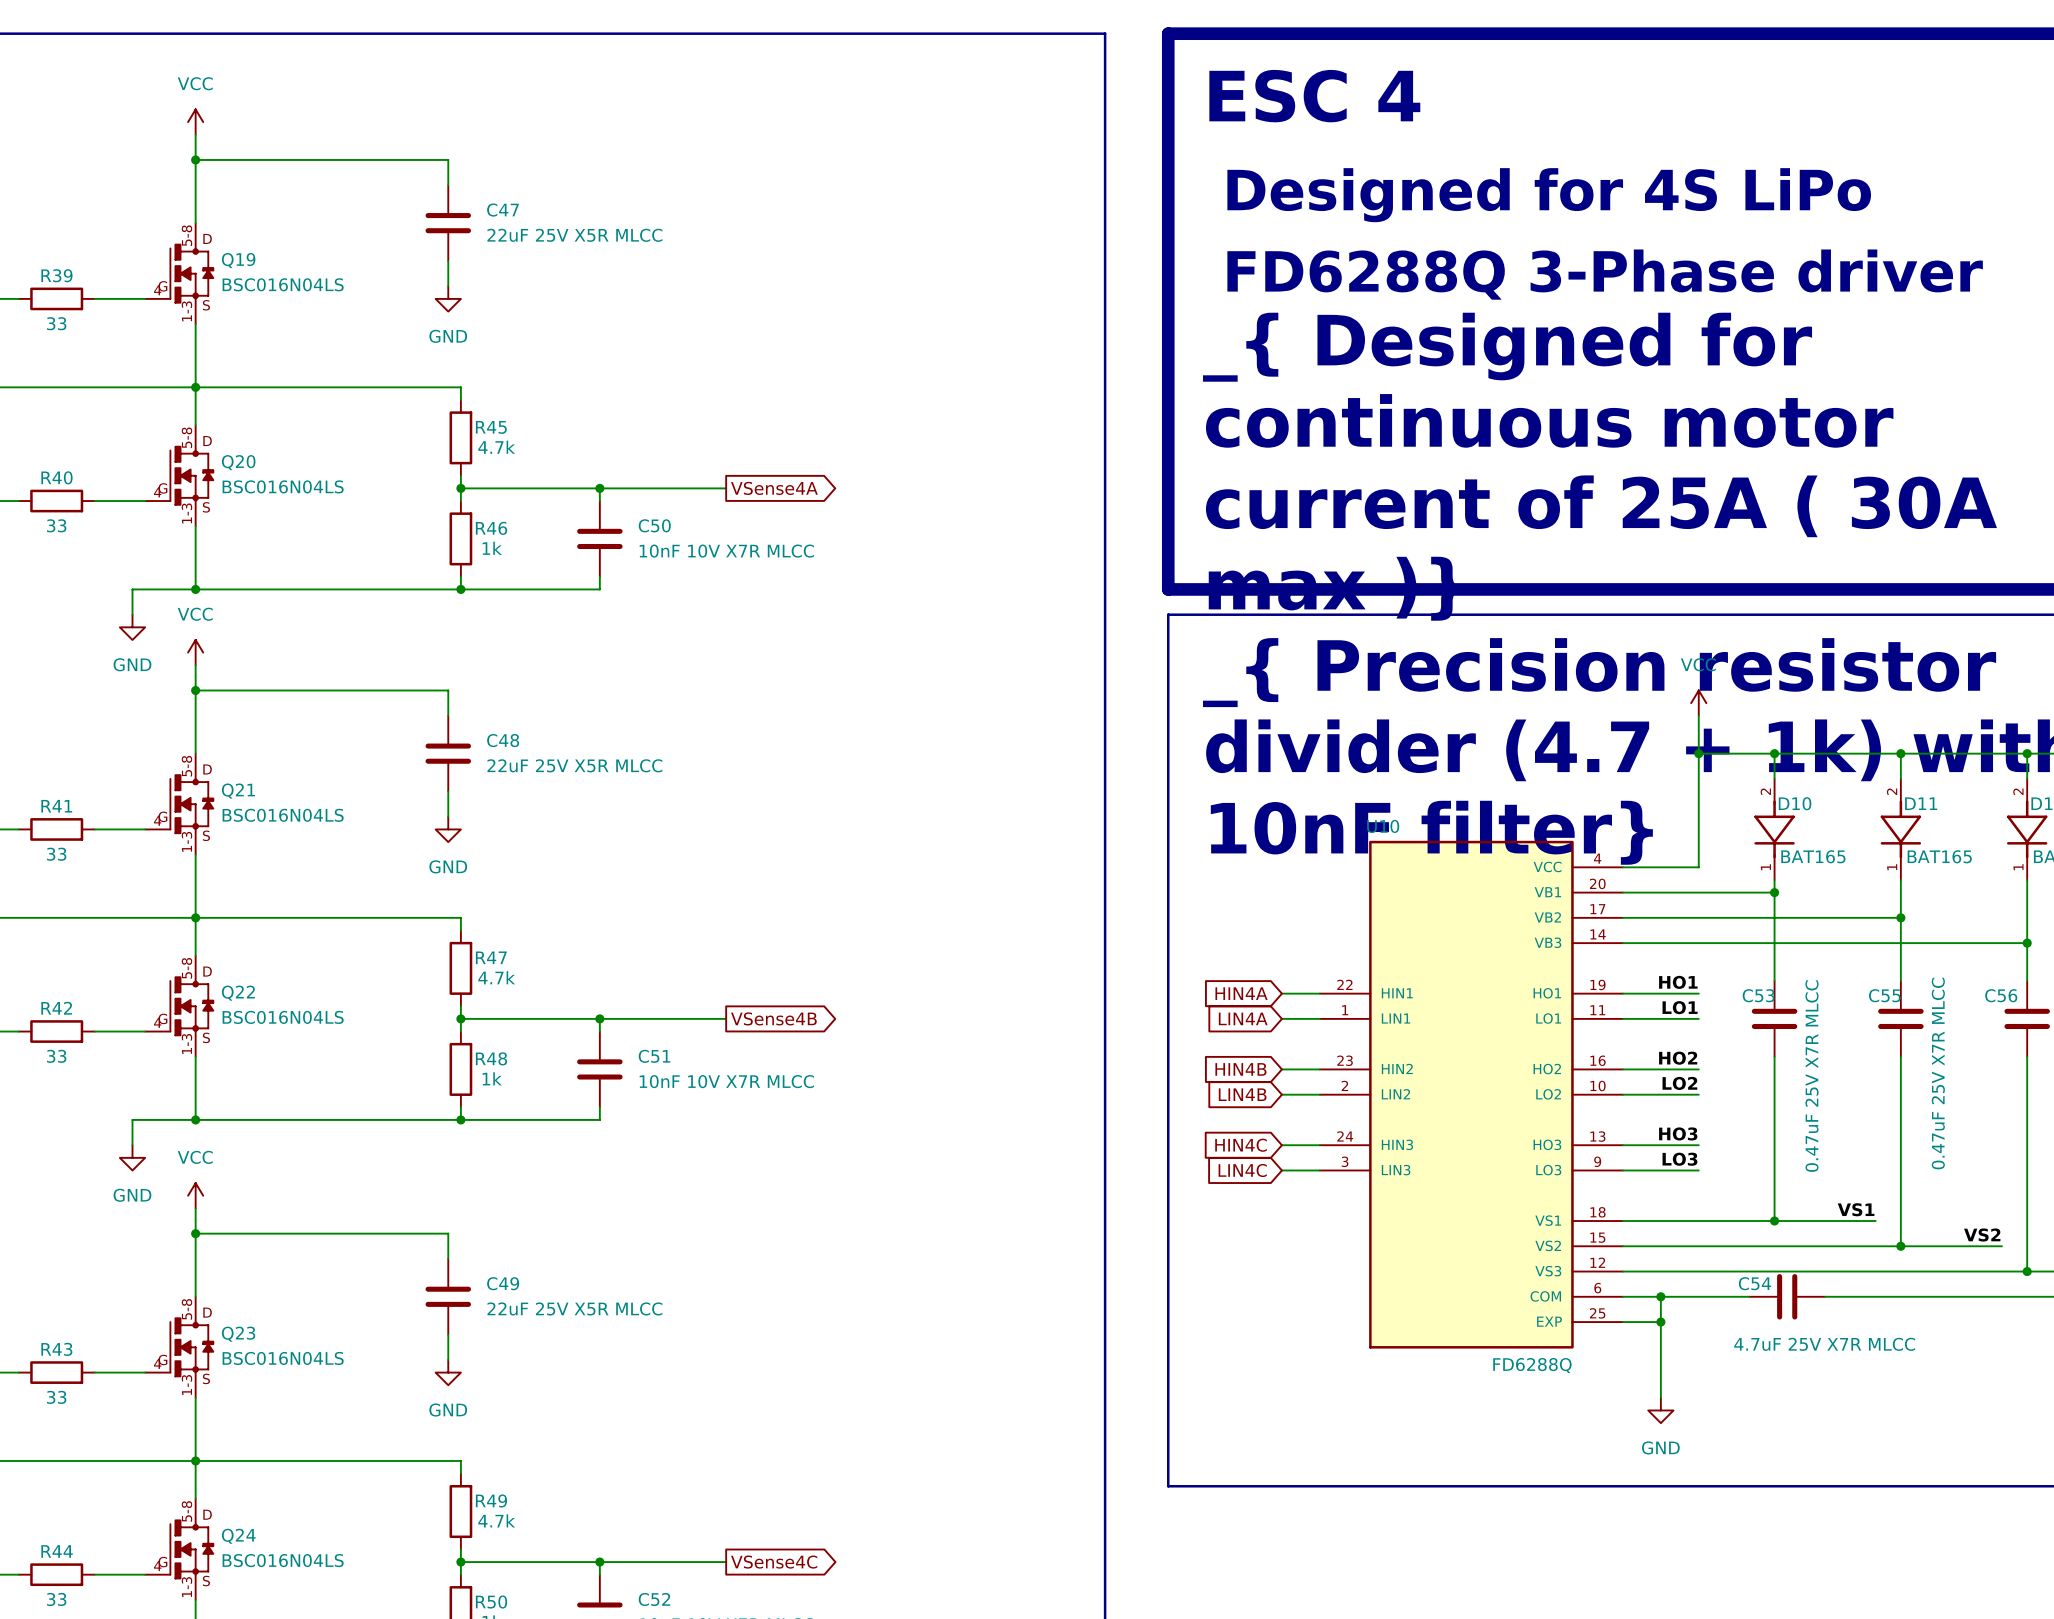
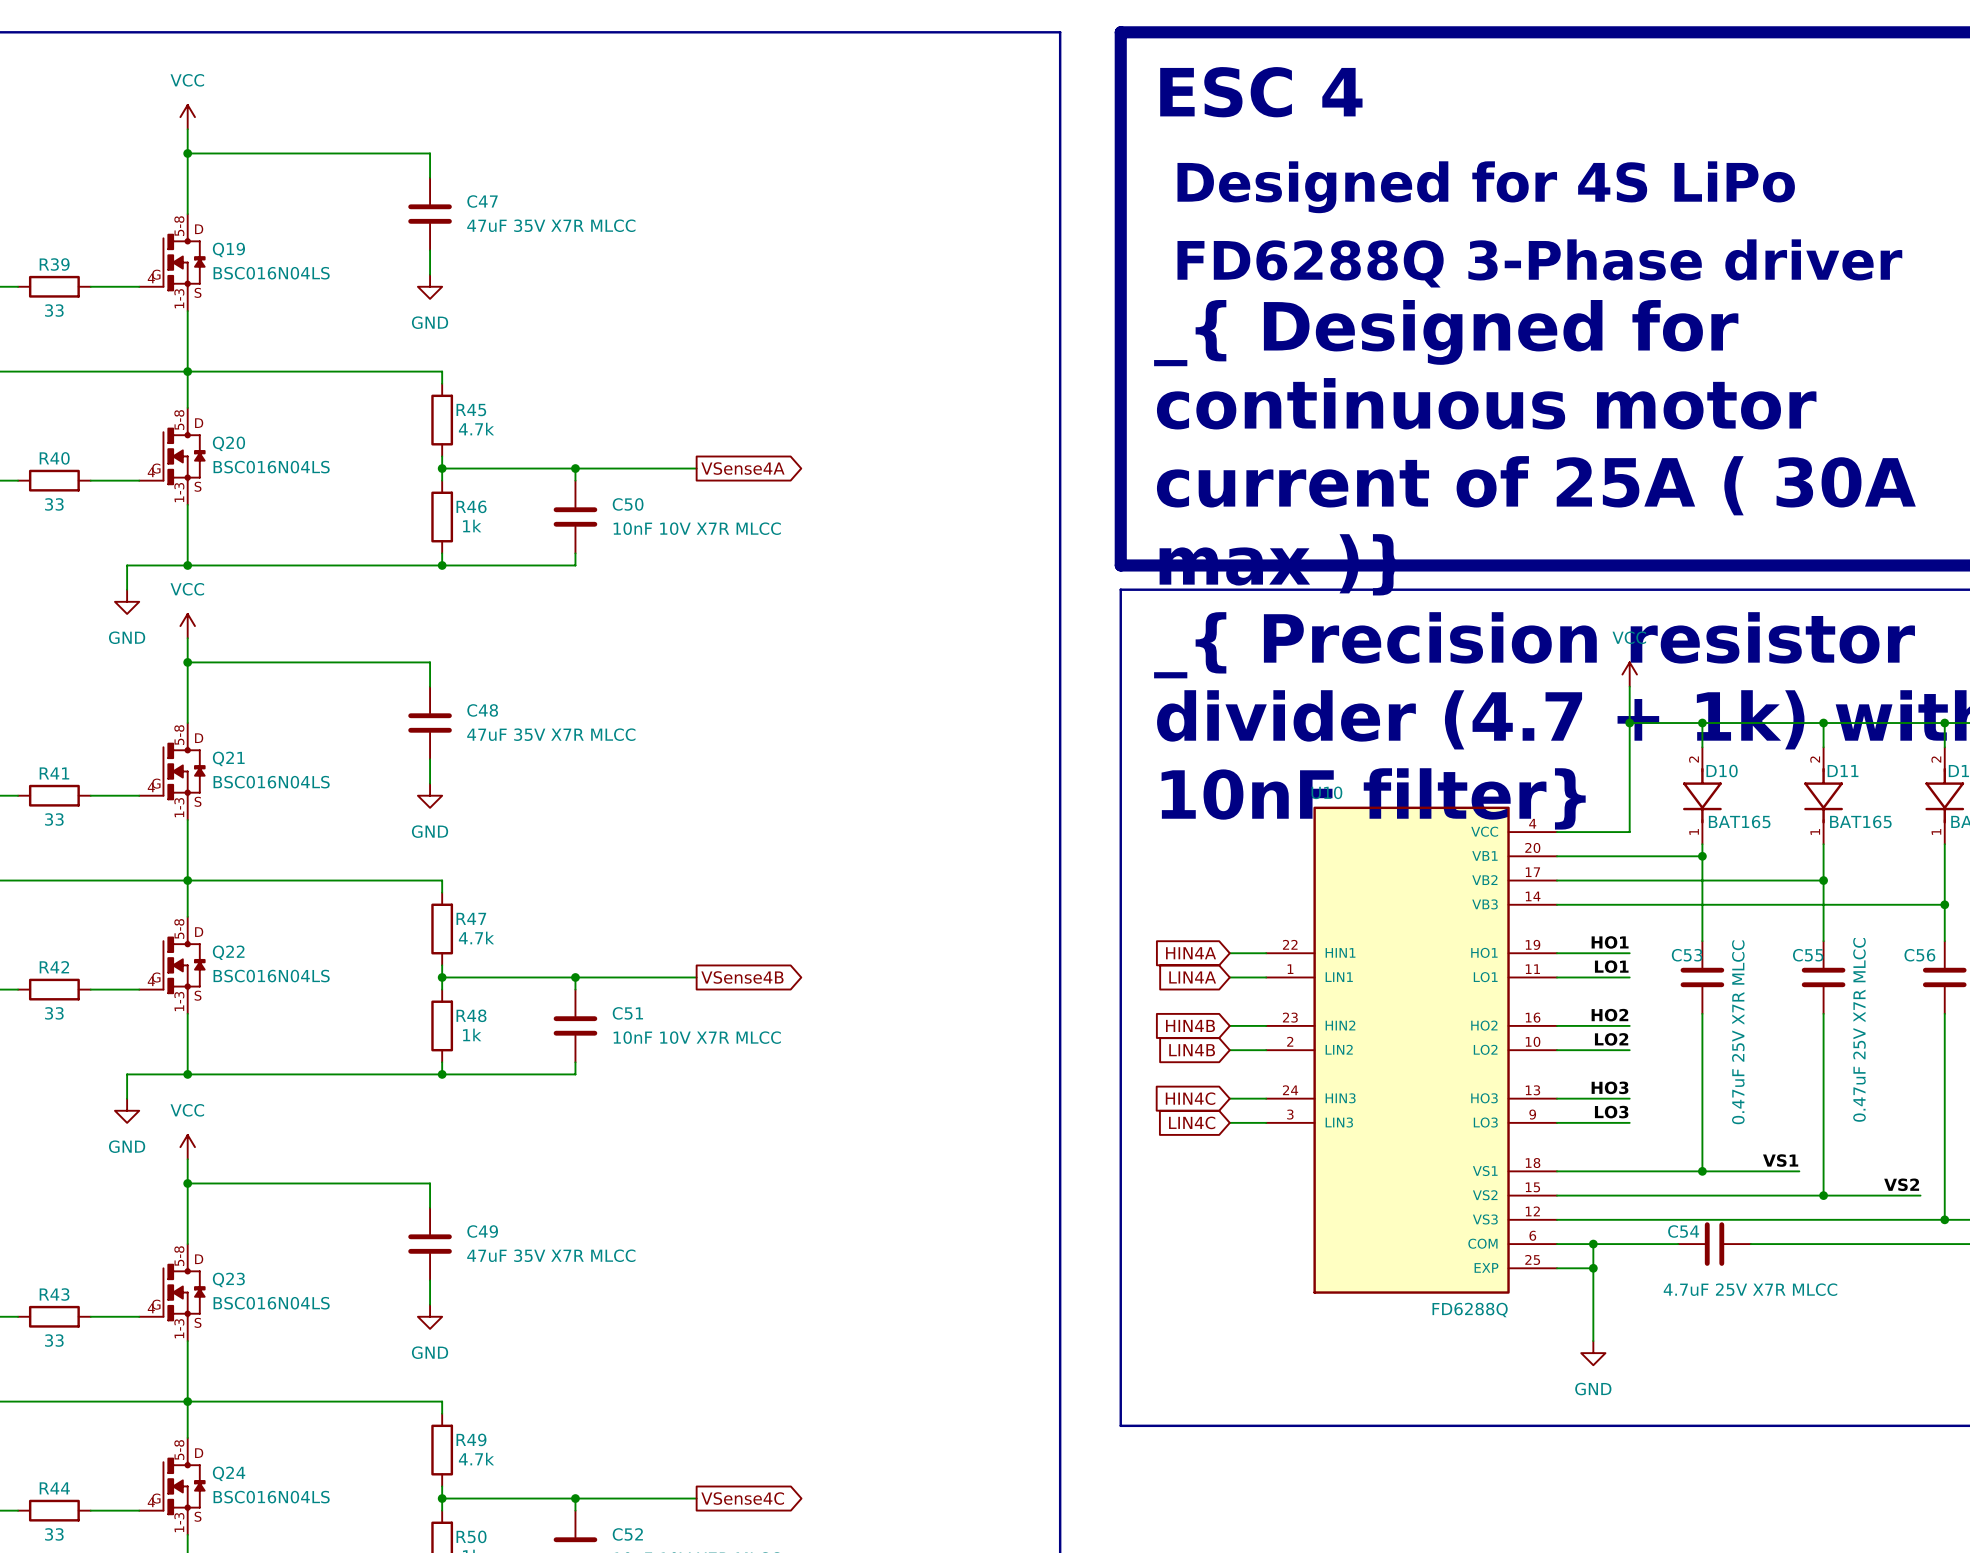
C47 value: 22uF 25V X5R MLCC (574, 235) -> 47uF 35V X7R MLCC (551, 225)
C48 value: 22uF 25V X5R MLCC (574, 765) -> 47uF 35V X7R MLCC (551, 734)
C49 value: 22uF 25V X5R MLCC (574, 1308) -> 47uF 35V X7R MLCC (551, 1255)

